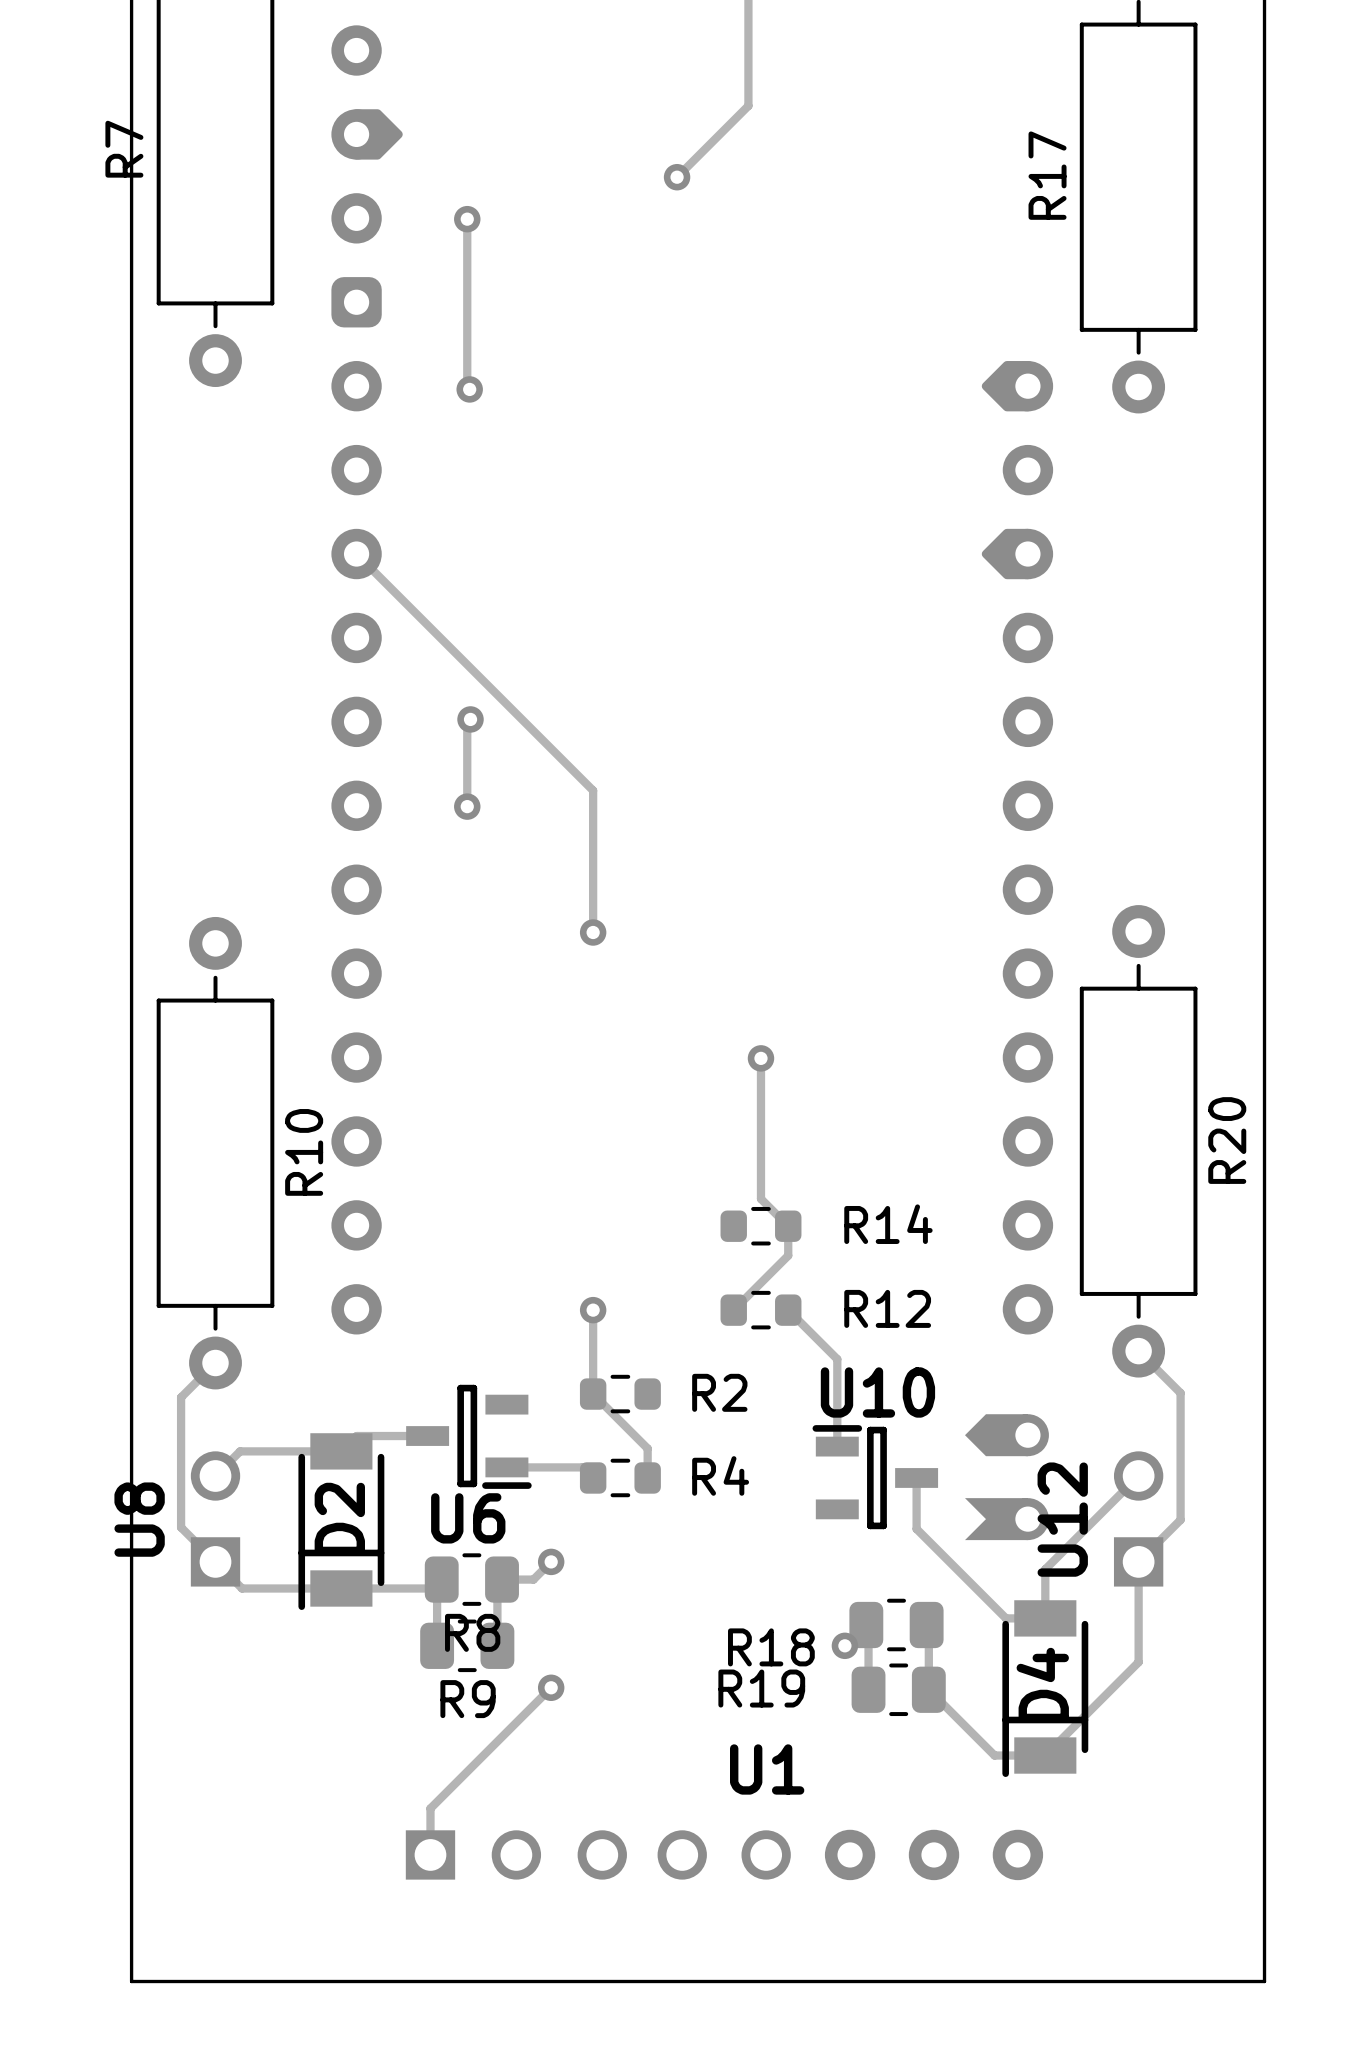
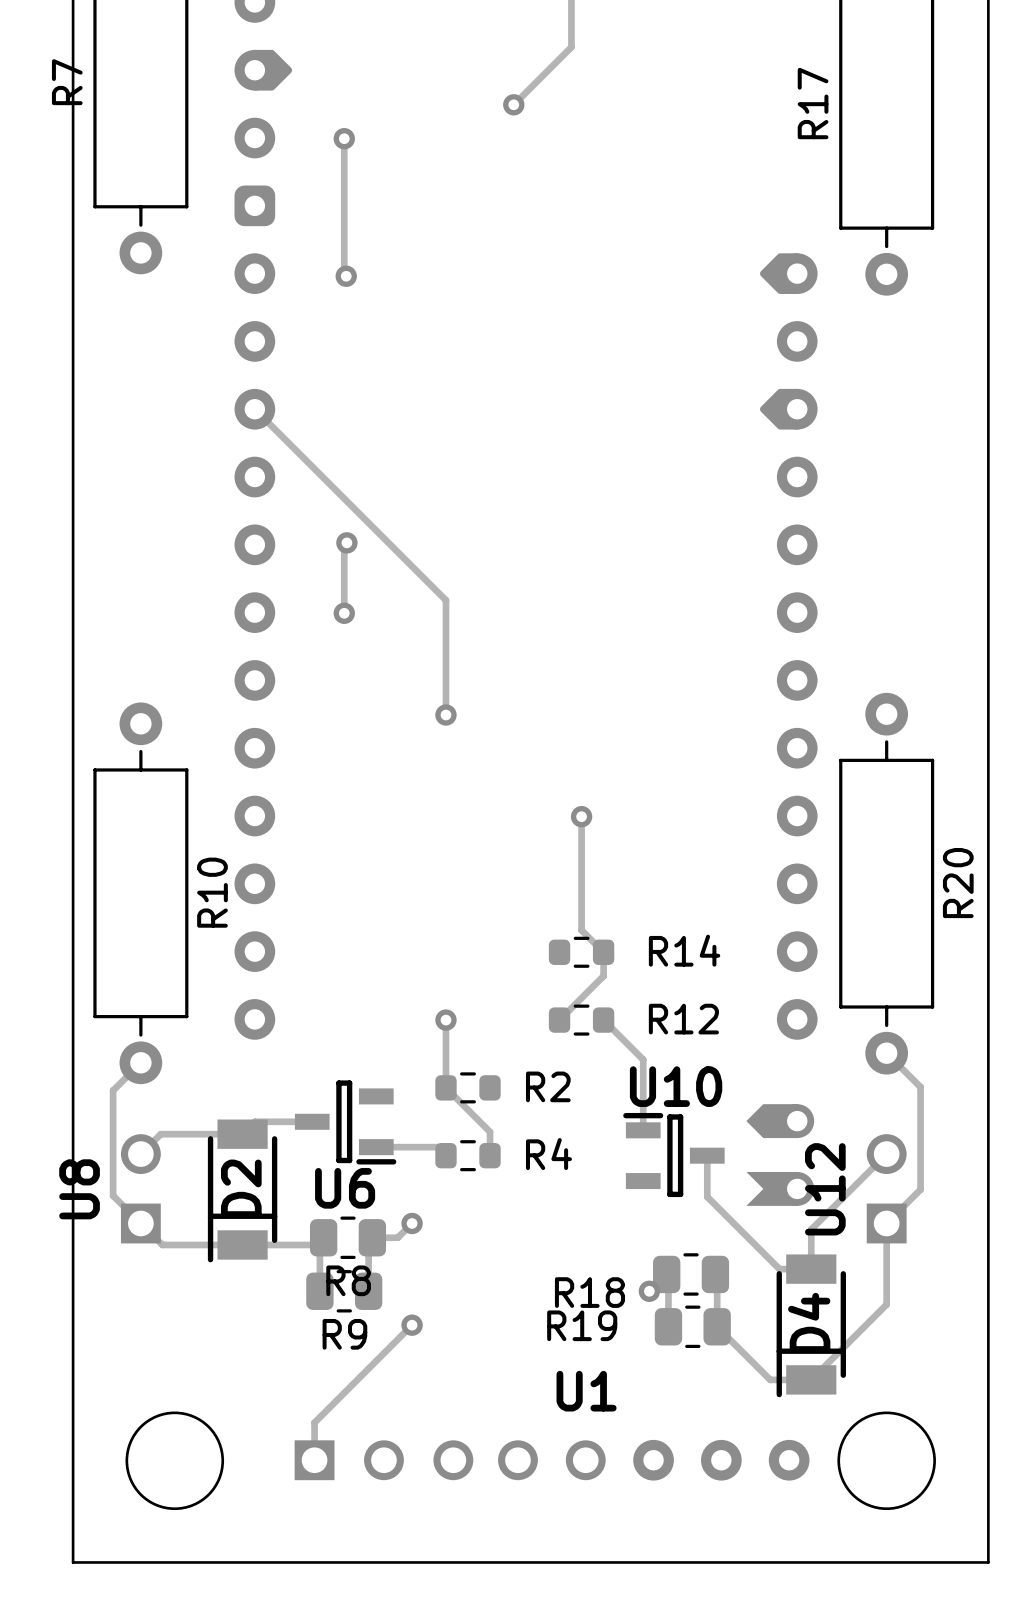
round board edge: none -> [125, 1411, 225, 1511]
round board edge: none -> [837, 1411, 936, 1511]

